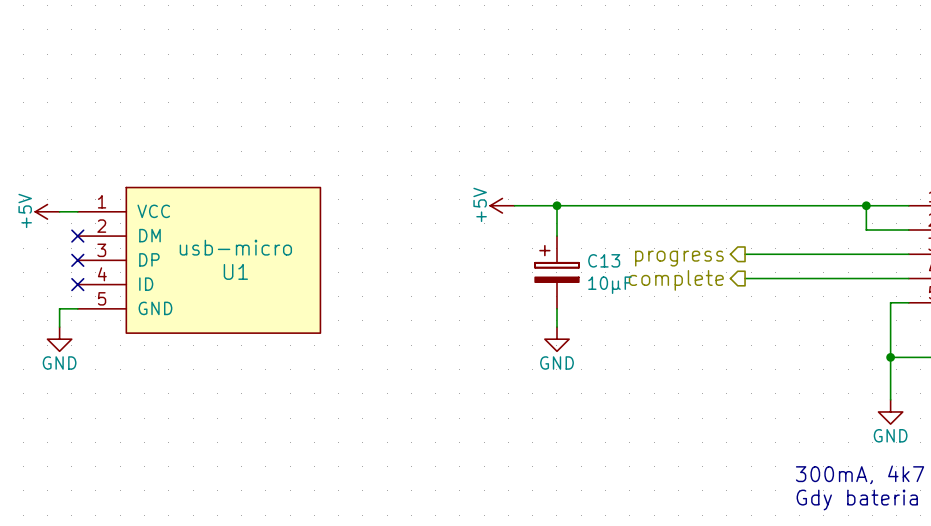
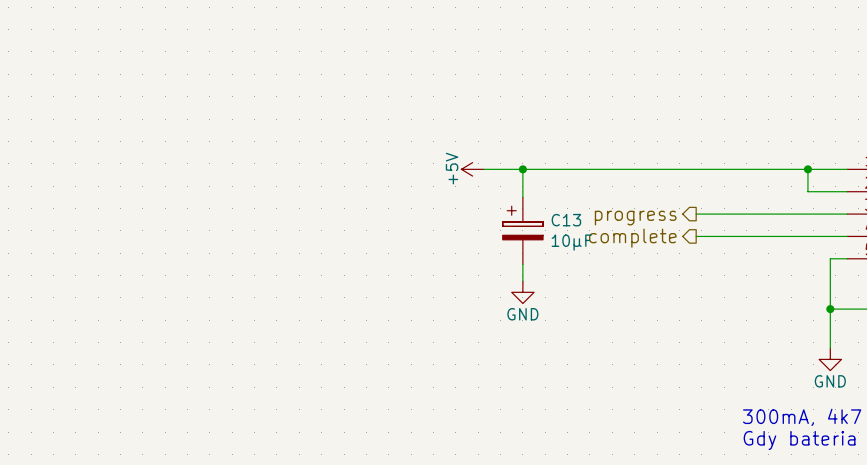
power symbol: +5V (47, 211) -> none
wire: (59, 211) (77, 211) -> none
no-connect mark: (77, 236) -> none
no-connect mark: (77, 260) -> none
U1: usb-micro (199, 260) -> none
no-connect mark: (77, 284) -> none
wire: (77, 308) (59, 308) (59, 327) -> none
power symbol: GND (59, 339) -> none

